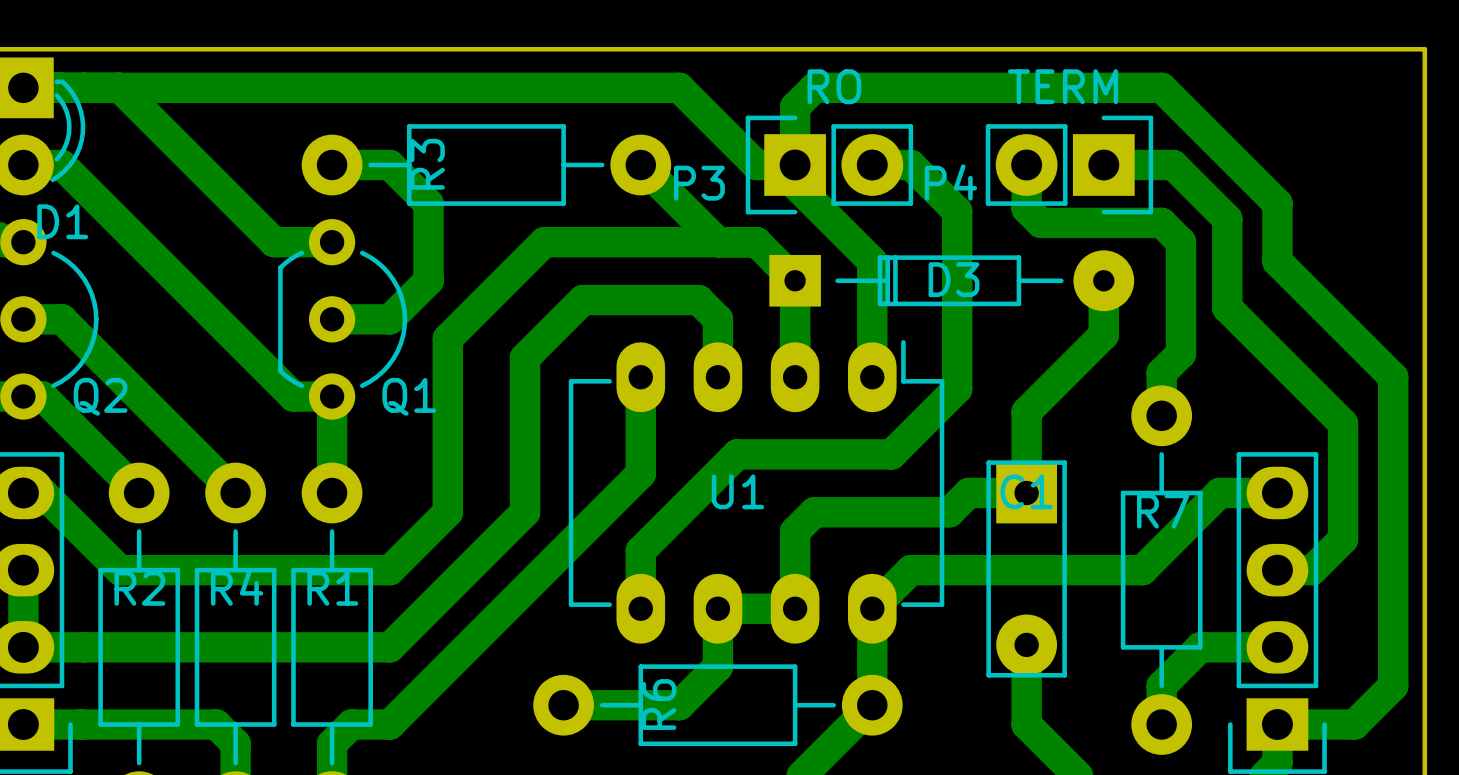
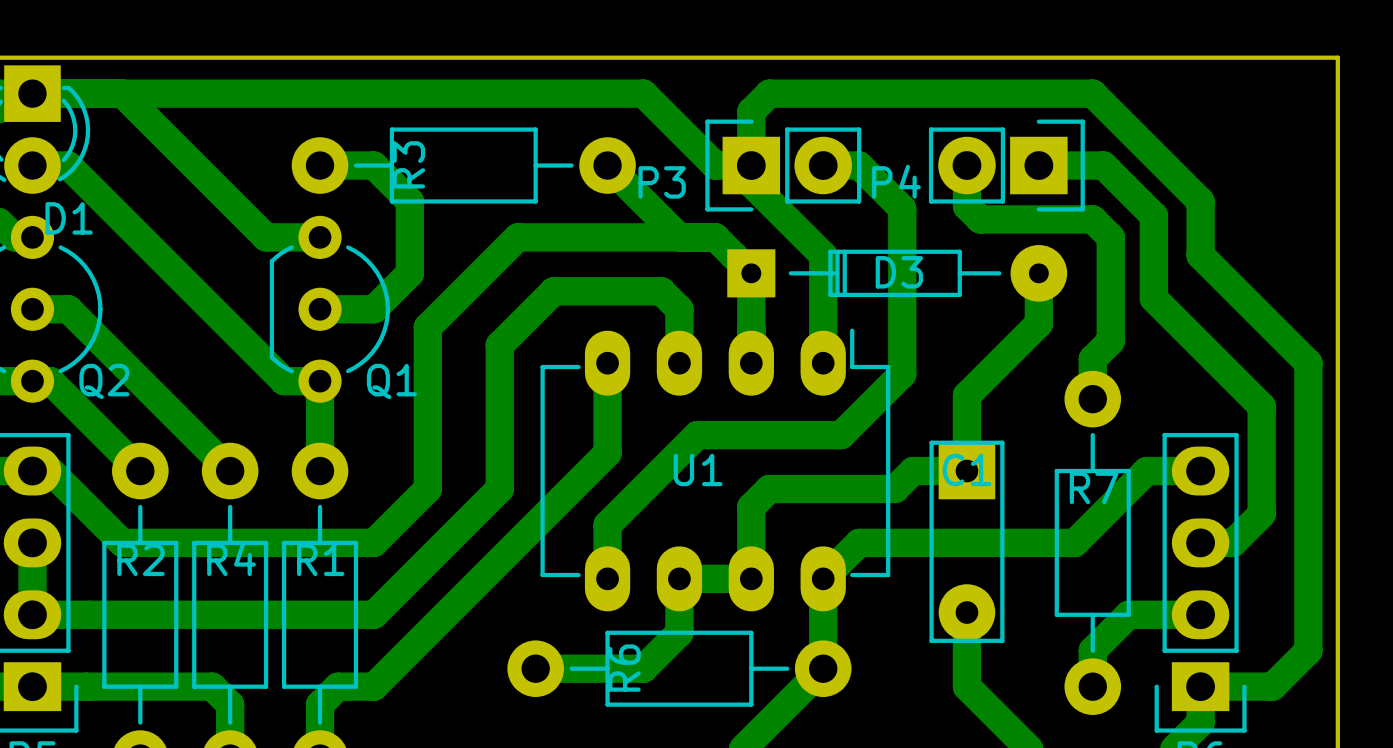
P3 value: RO (834, 86) -> none
P4 value: TERM (1063, 86) -> none

